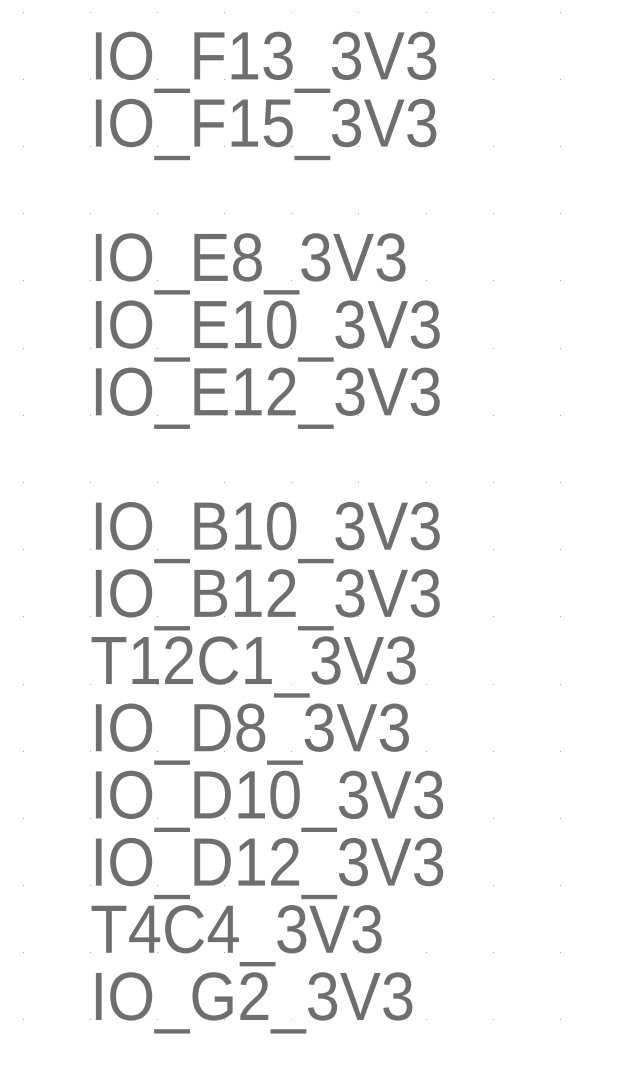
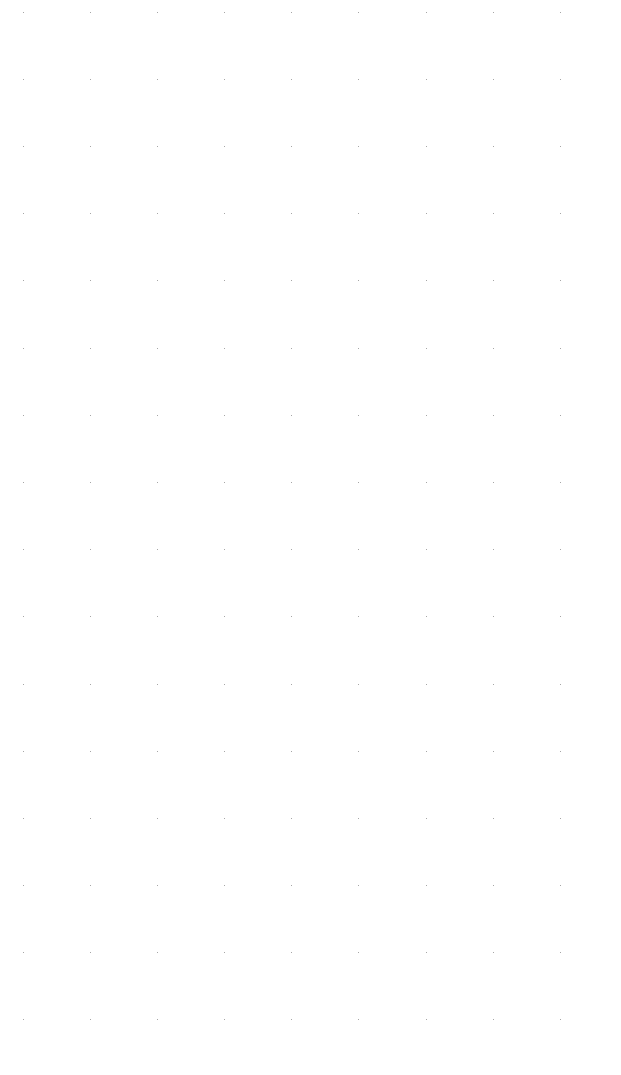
label: IO_F13_3V3 (266, 62) -> none
label: IO_F15_3V3 (266, 129) -> none
label: IO_E8_3V3 (250, 263) -> none
label: IO_E10_3V3 (267, 331) -> none
label: IO_E12_3V3 (267, 398) -> none
label: IO_B10_3V3 (267, 532) -> none
label: IO_B12_3V3 (267, 599) -> none
label: T12C1_3V3 (253, 666) -> none
label: IO_D8_3V3 (252, 734) -> none
label: IO_D10_3V3 (269, 801) -> none
label: IO_D12_3V3 (269, 868) -> none
label: T4C4_3V3 (236, 935) -> none
label: IO_G2_3V3 (254, 1002) -> none

